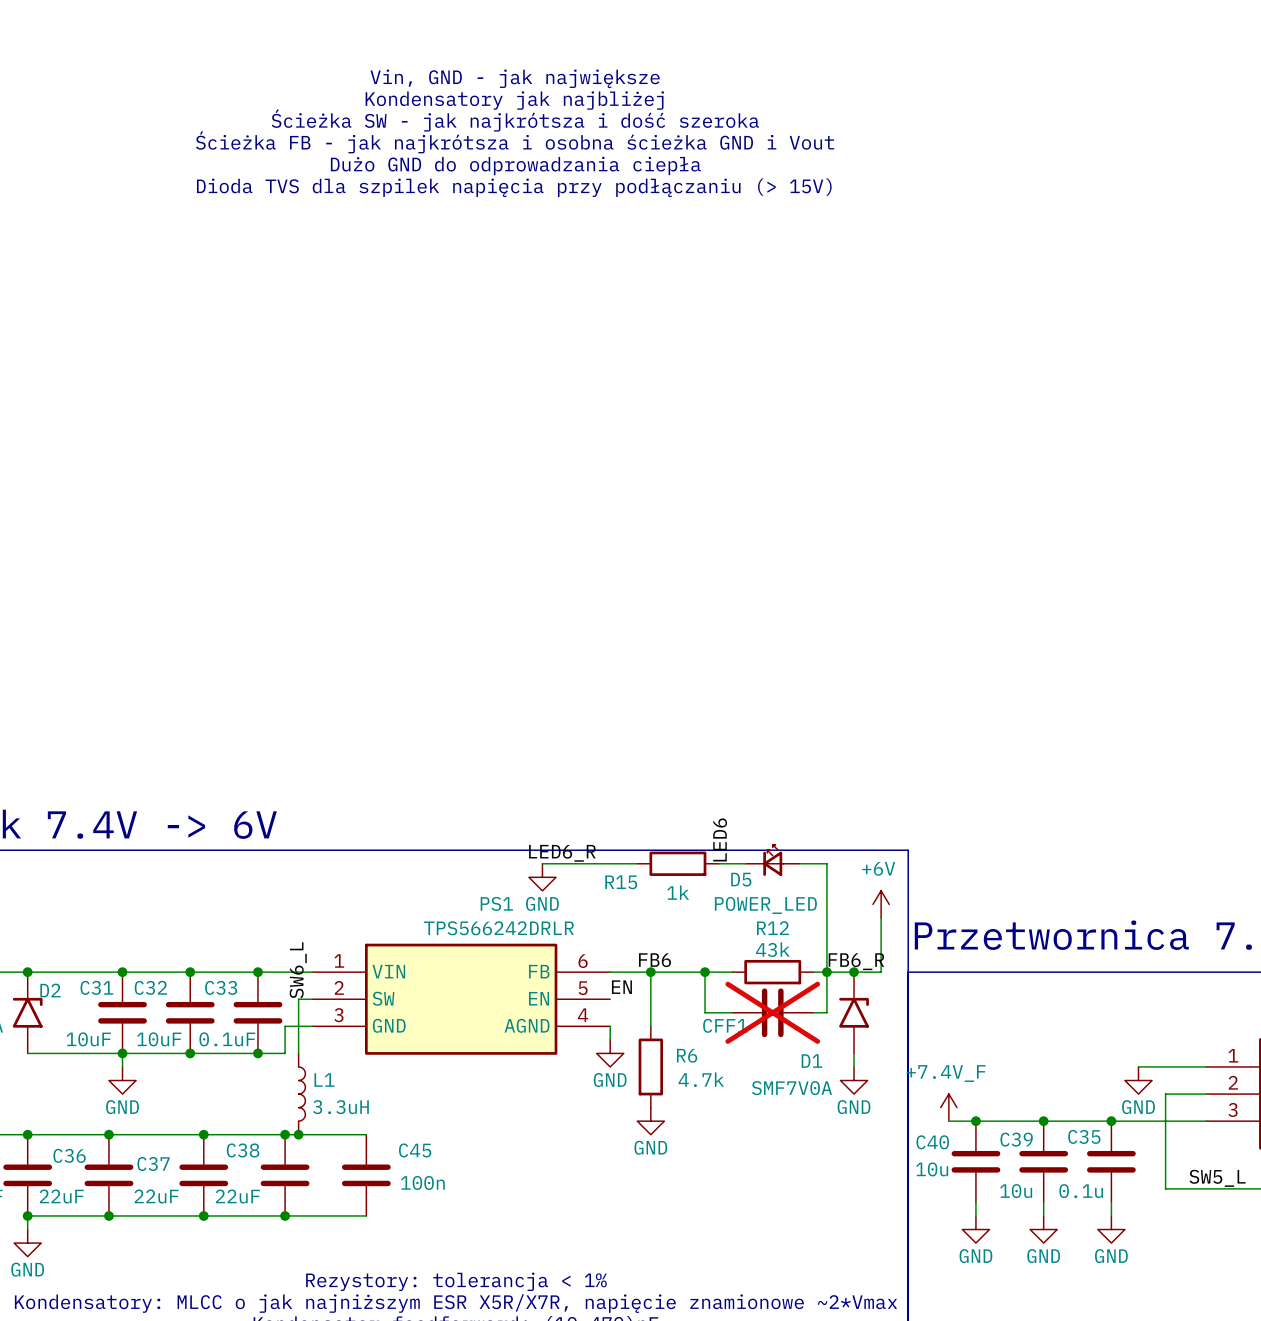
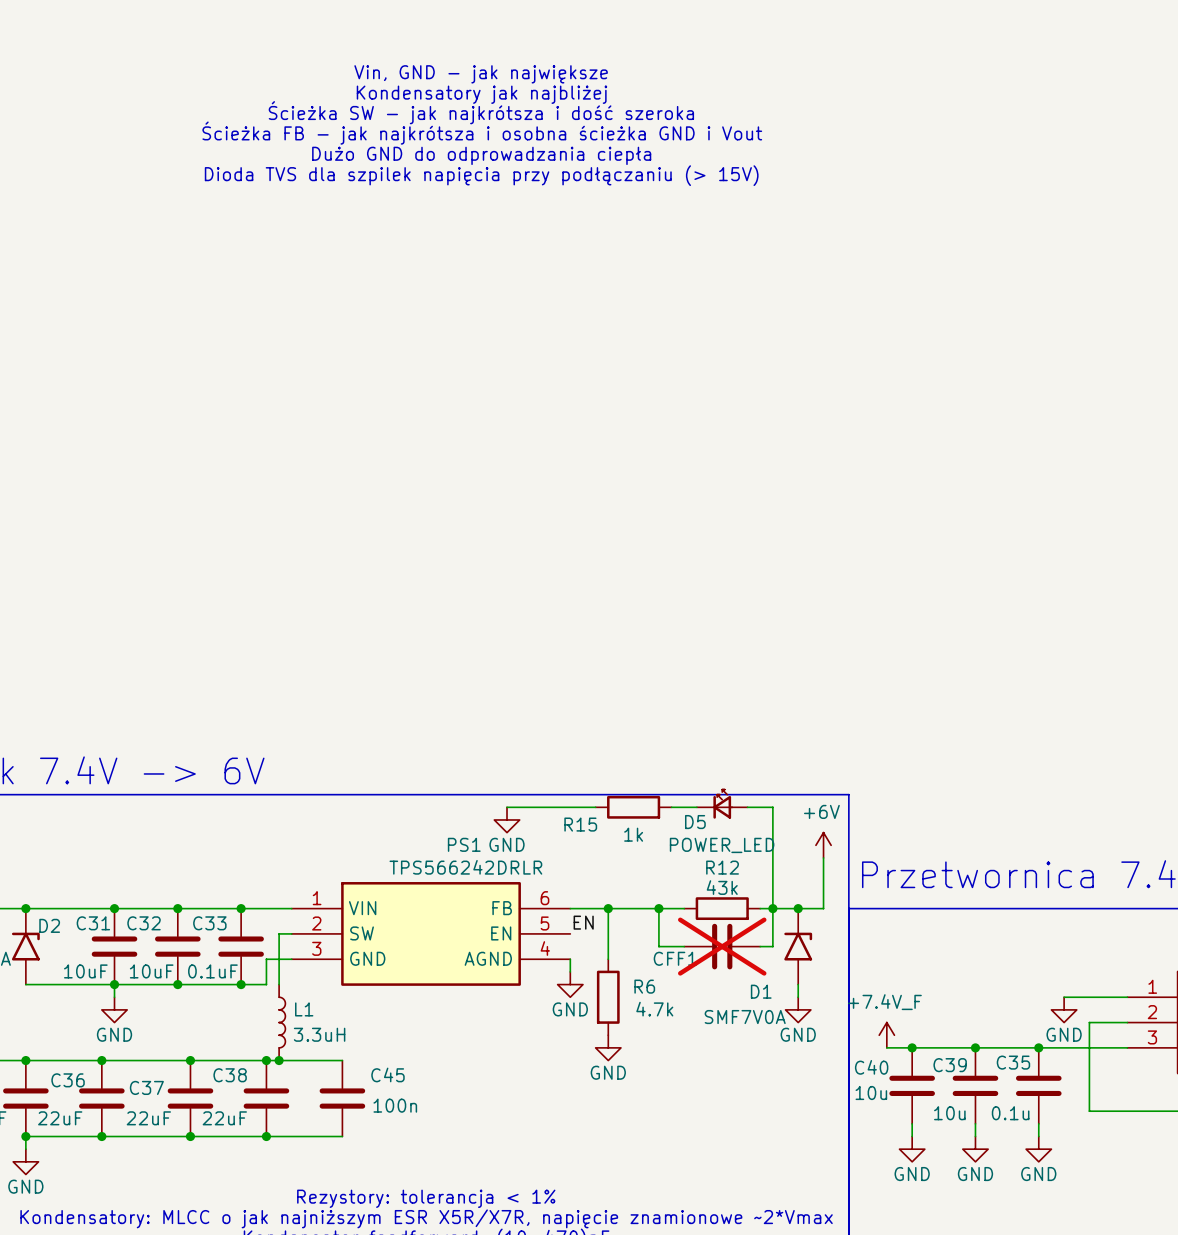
label: LED6 (720, 839) -> none
label: LED6_R (562, 853) -> none
label: FB6 (655, 960) -> none
label: FB6_R (856, 961) -> none
label: SW6_L (298, 970) -> none
label: SW5_L (1217, 1178) -> none

